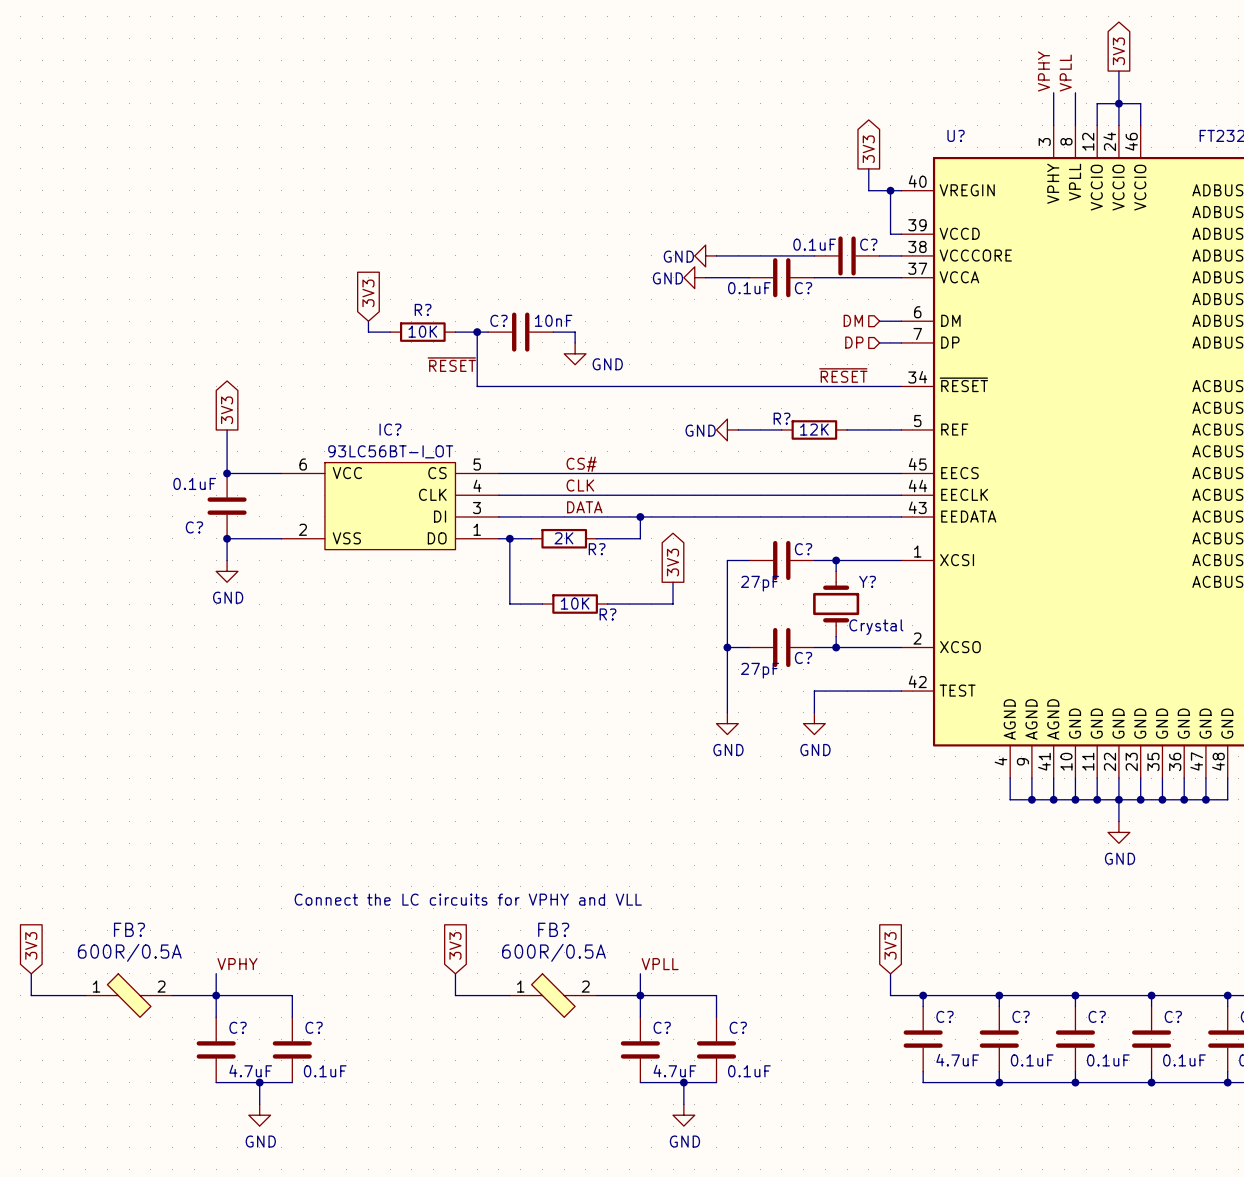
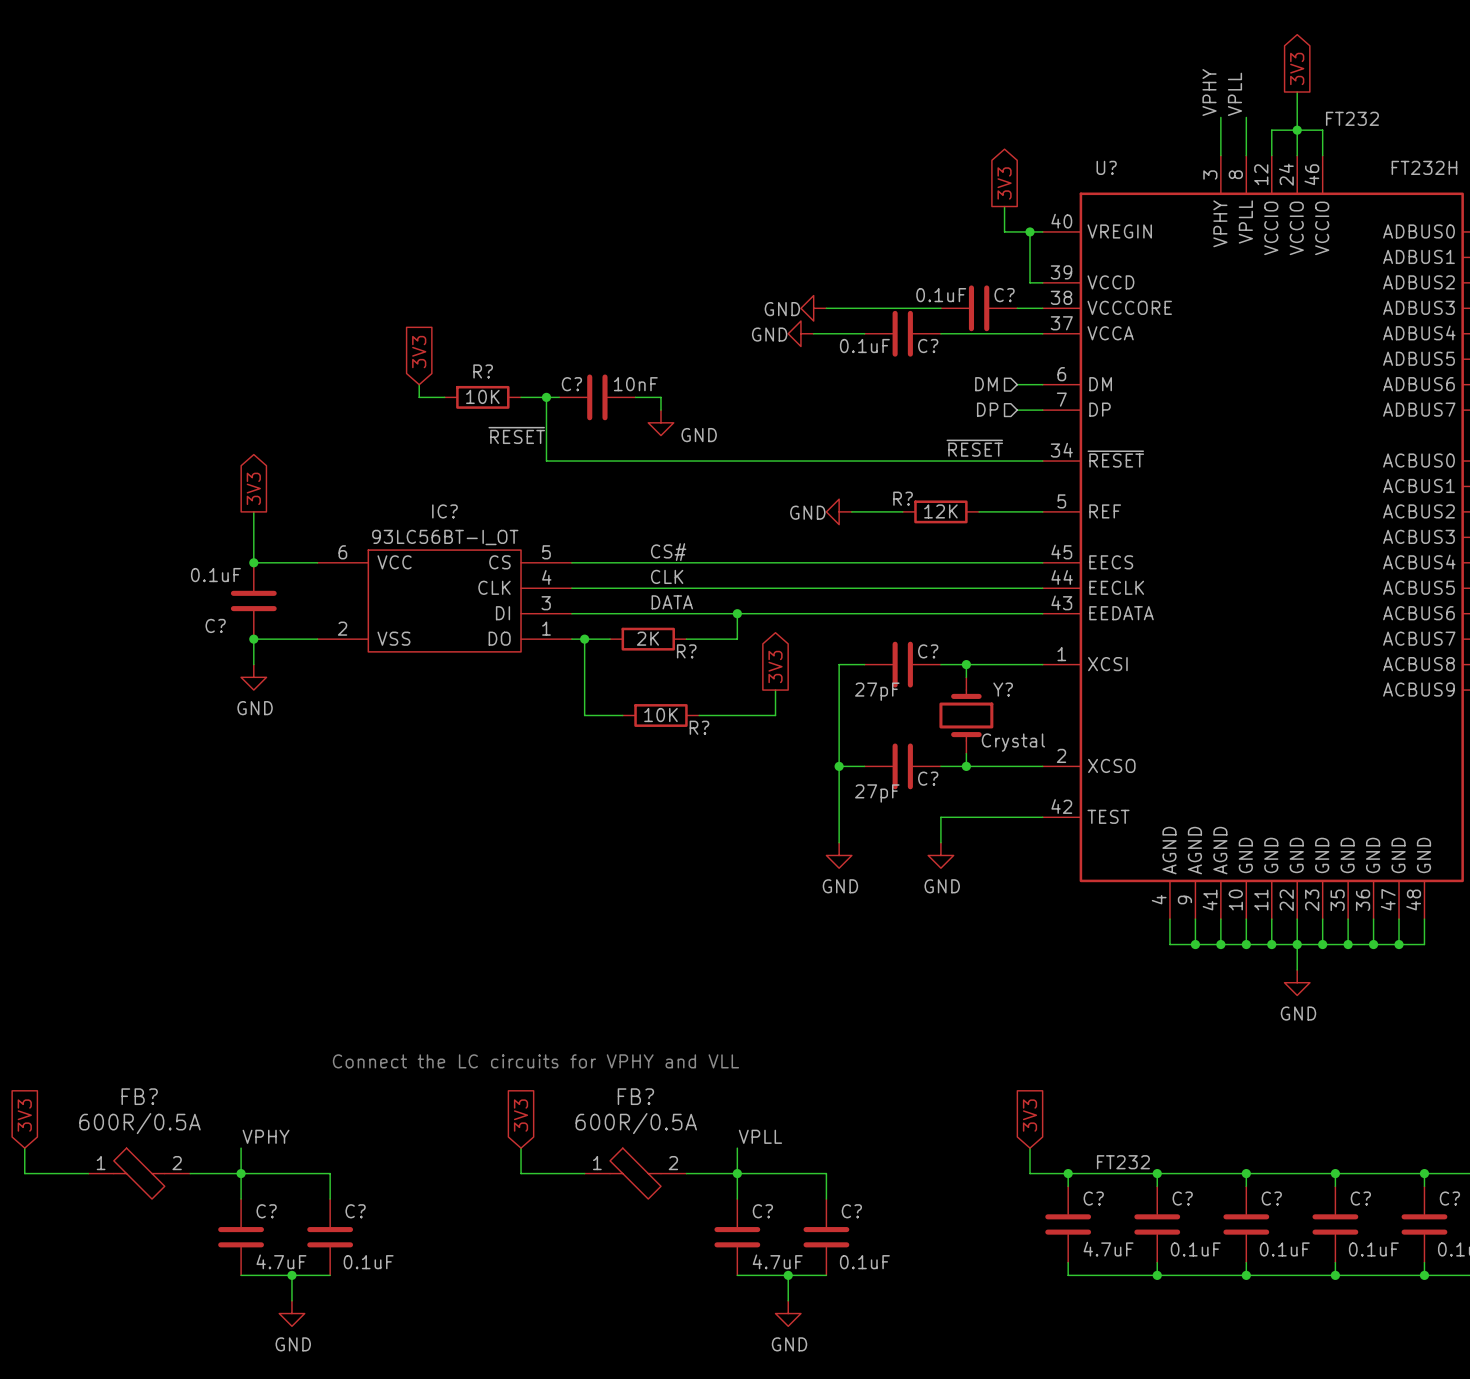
label: none -> FT232 (1352, 118)
label: none -> FT232 (1123, 1162)

